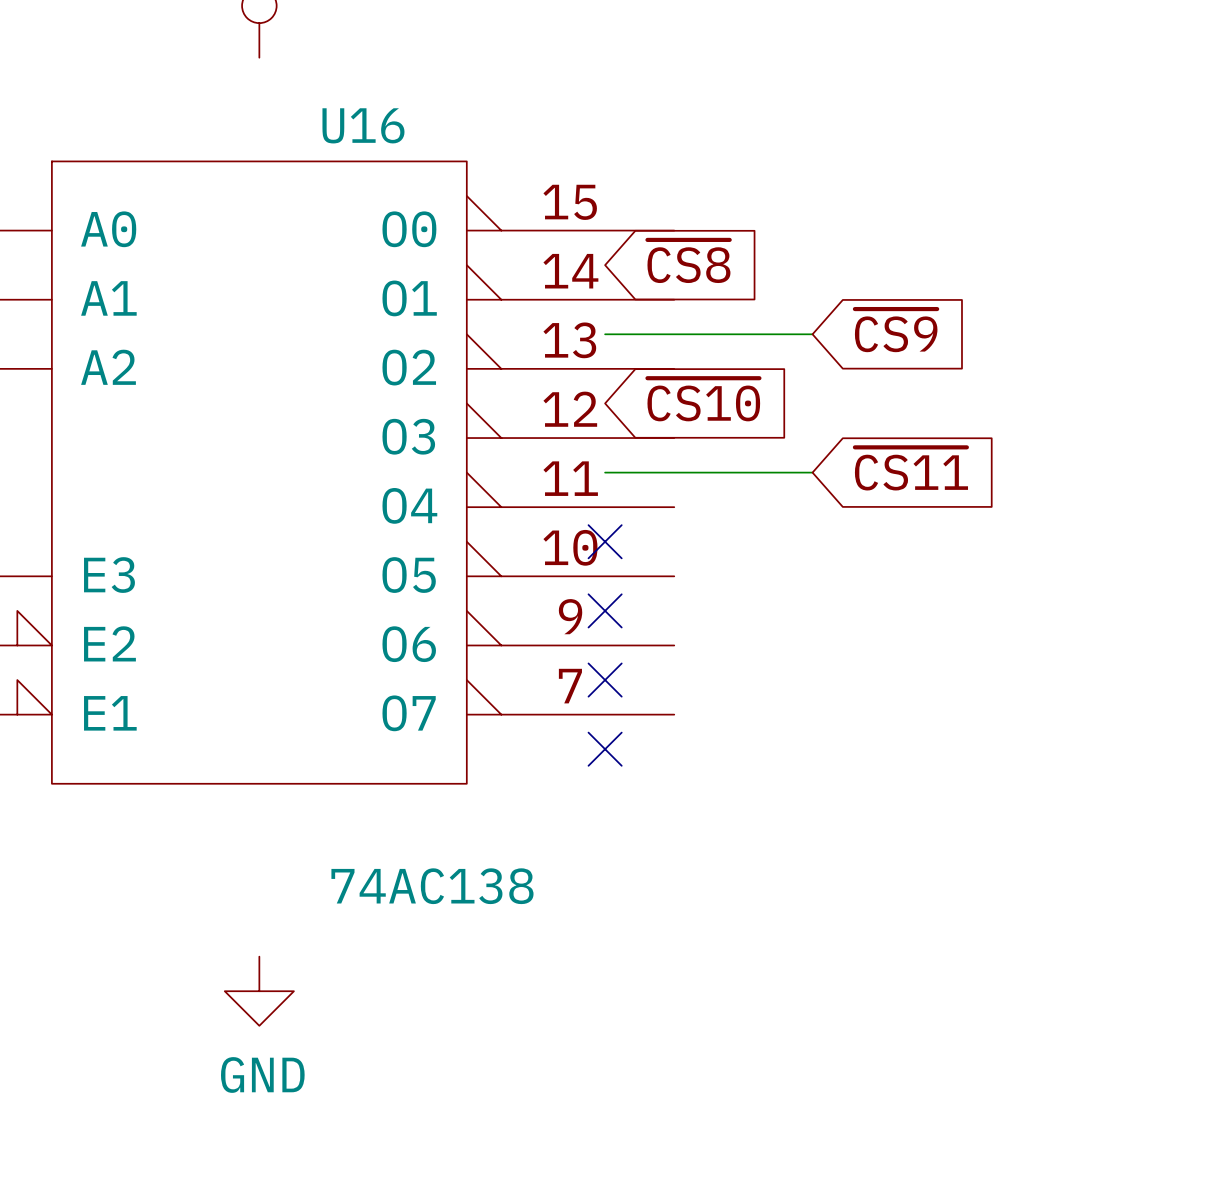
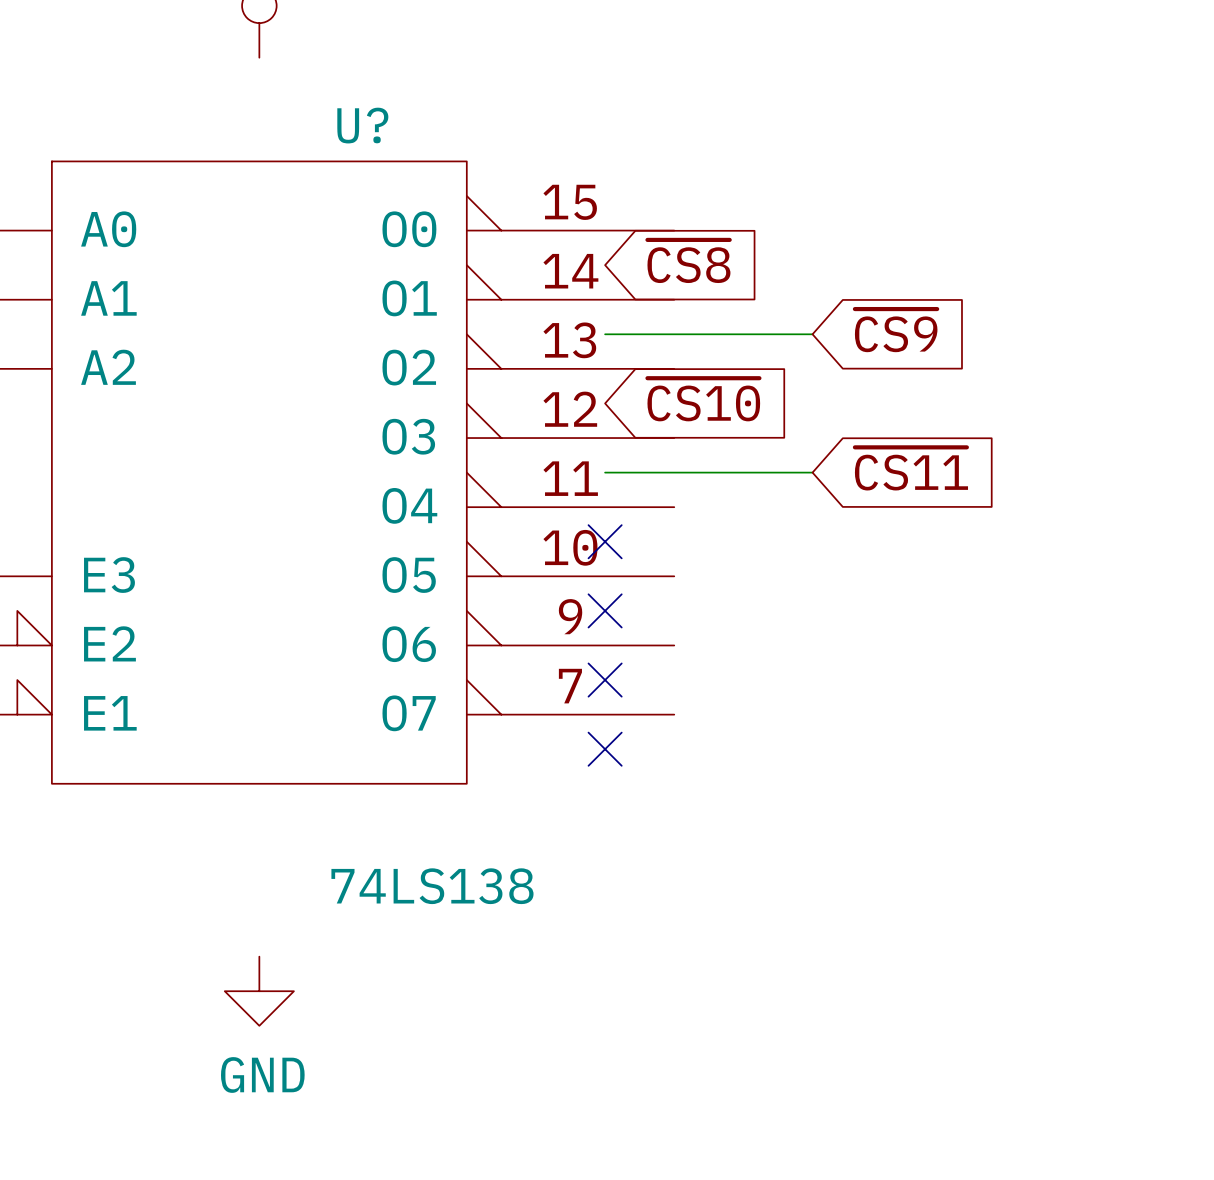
U16 name: U16 (363, 125) -> U? (362, 125)
U16 value: 74AC138 (432, 886) -> 74LS138 (432, 886)

